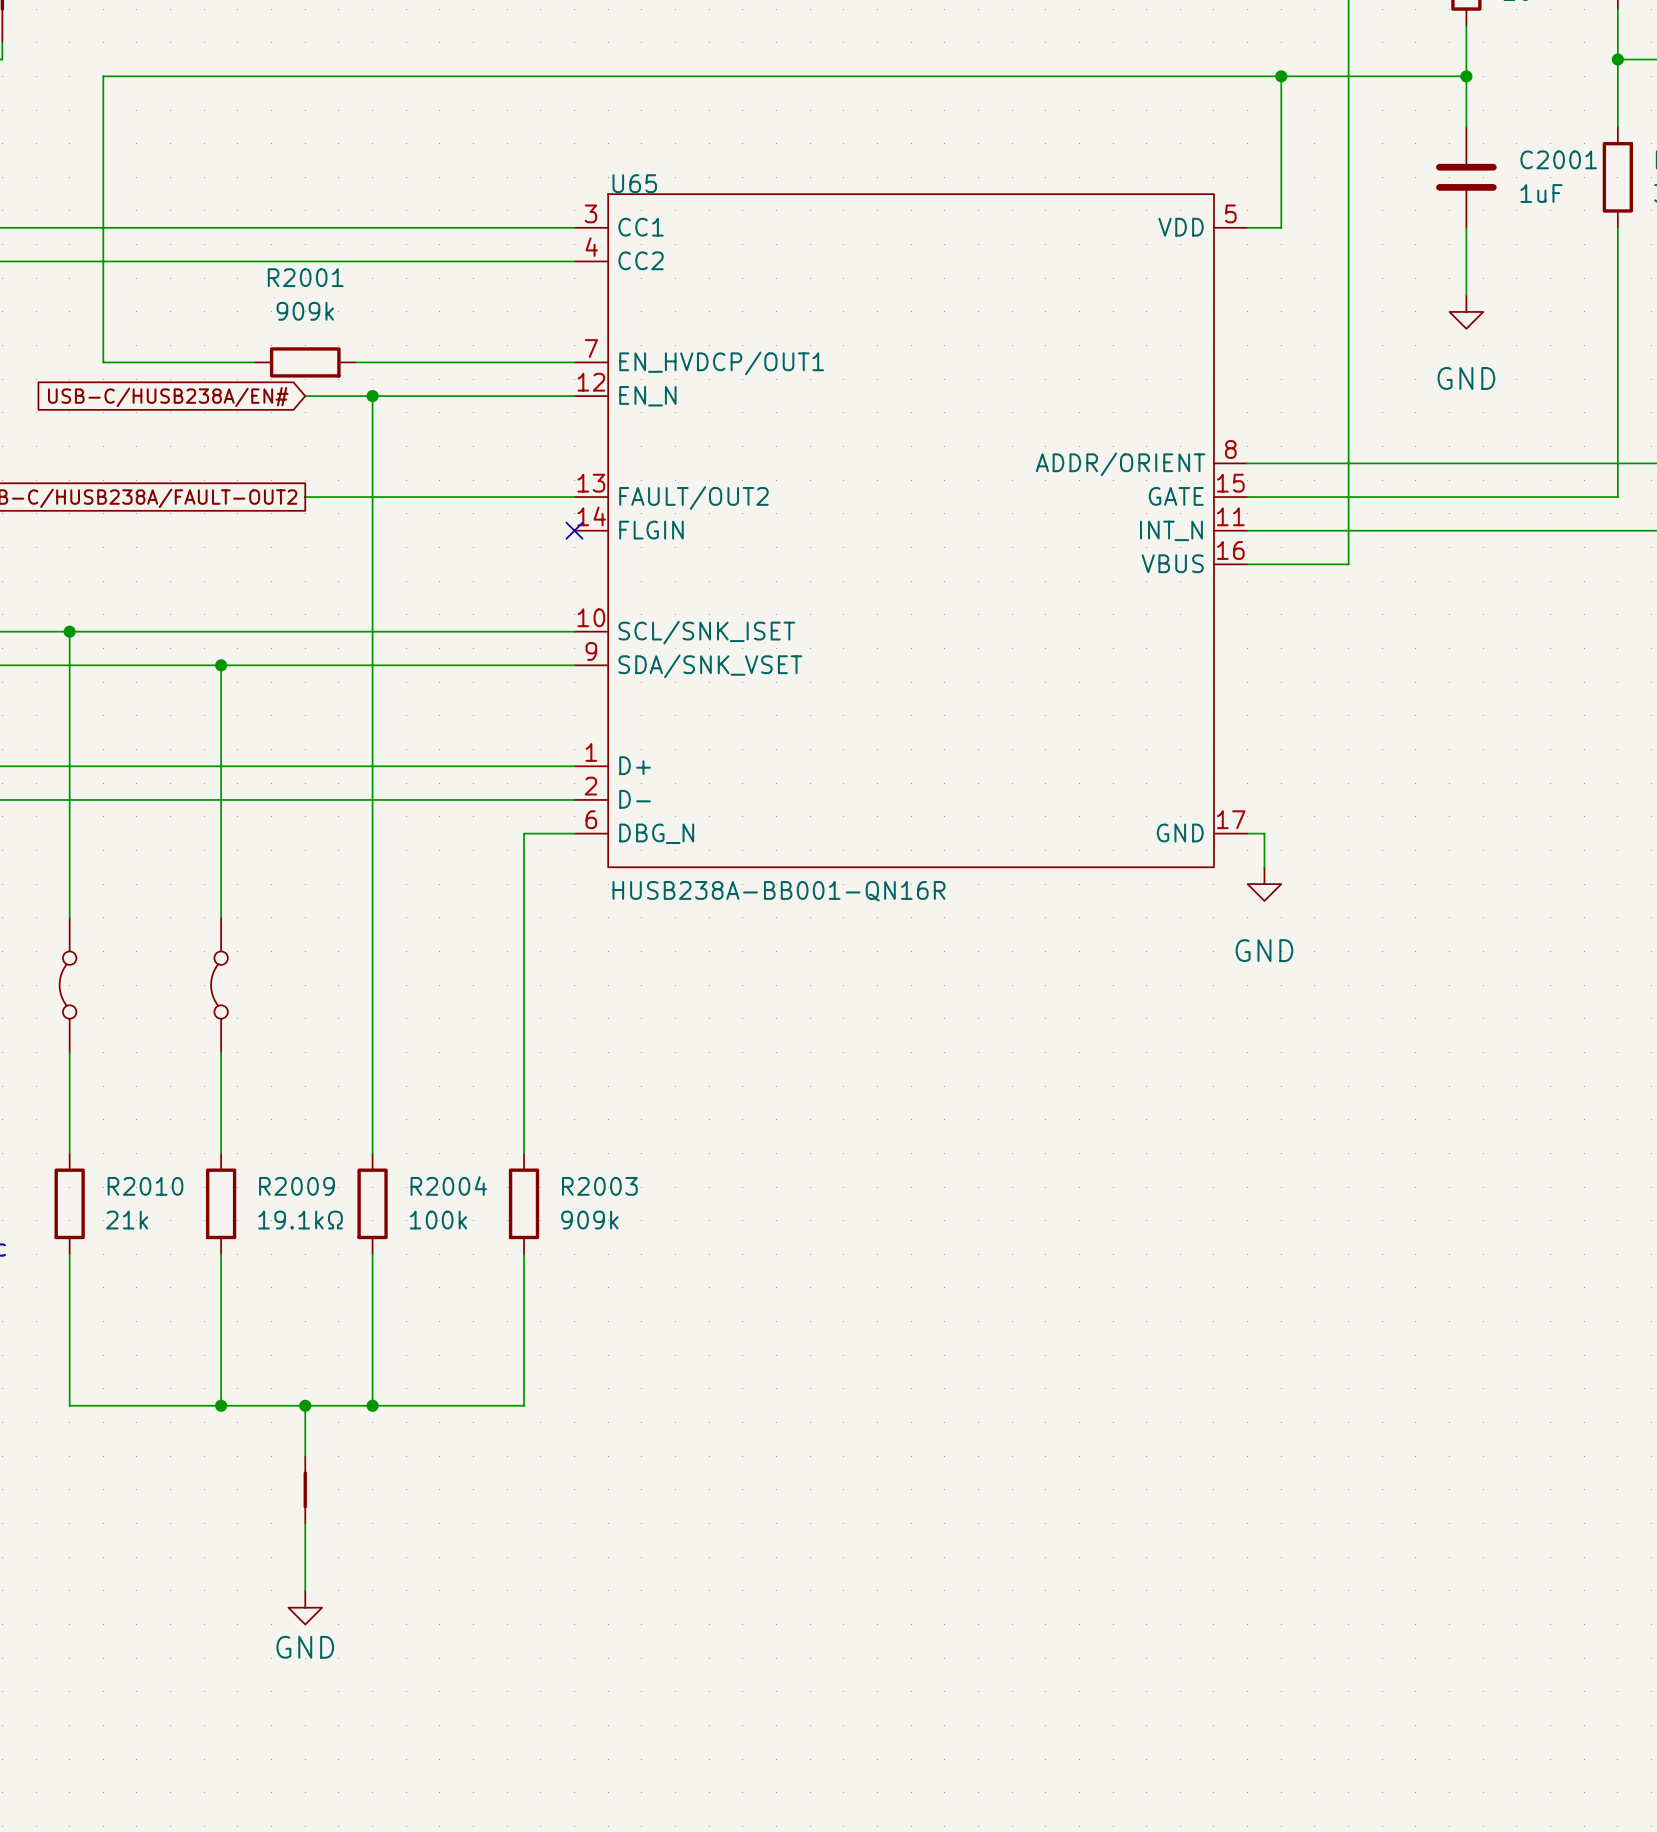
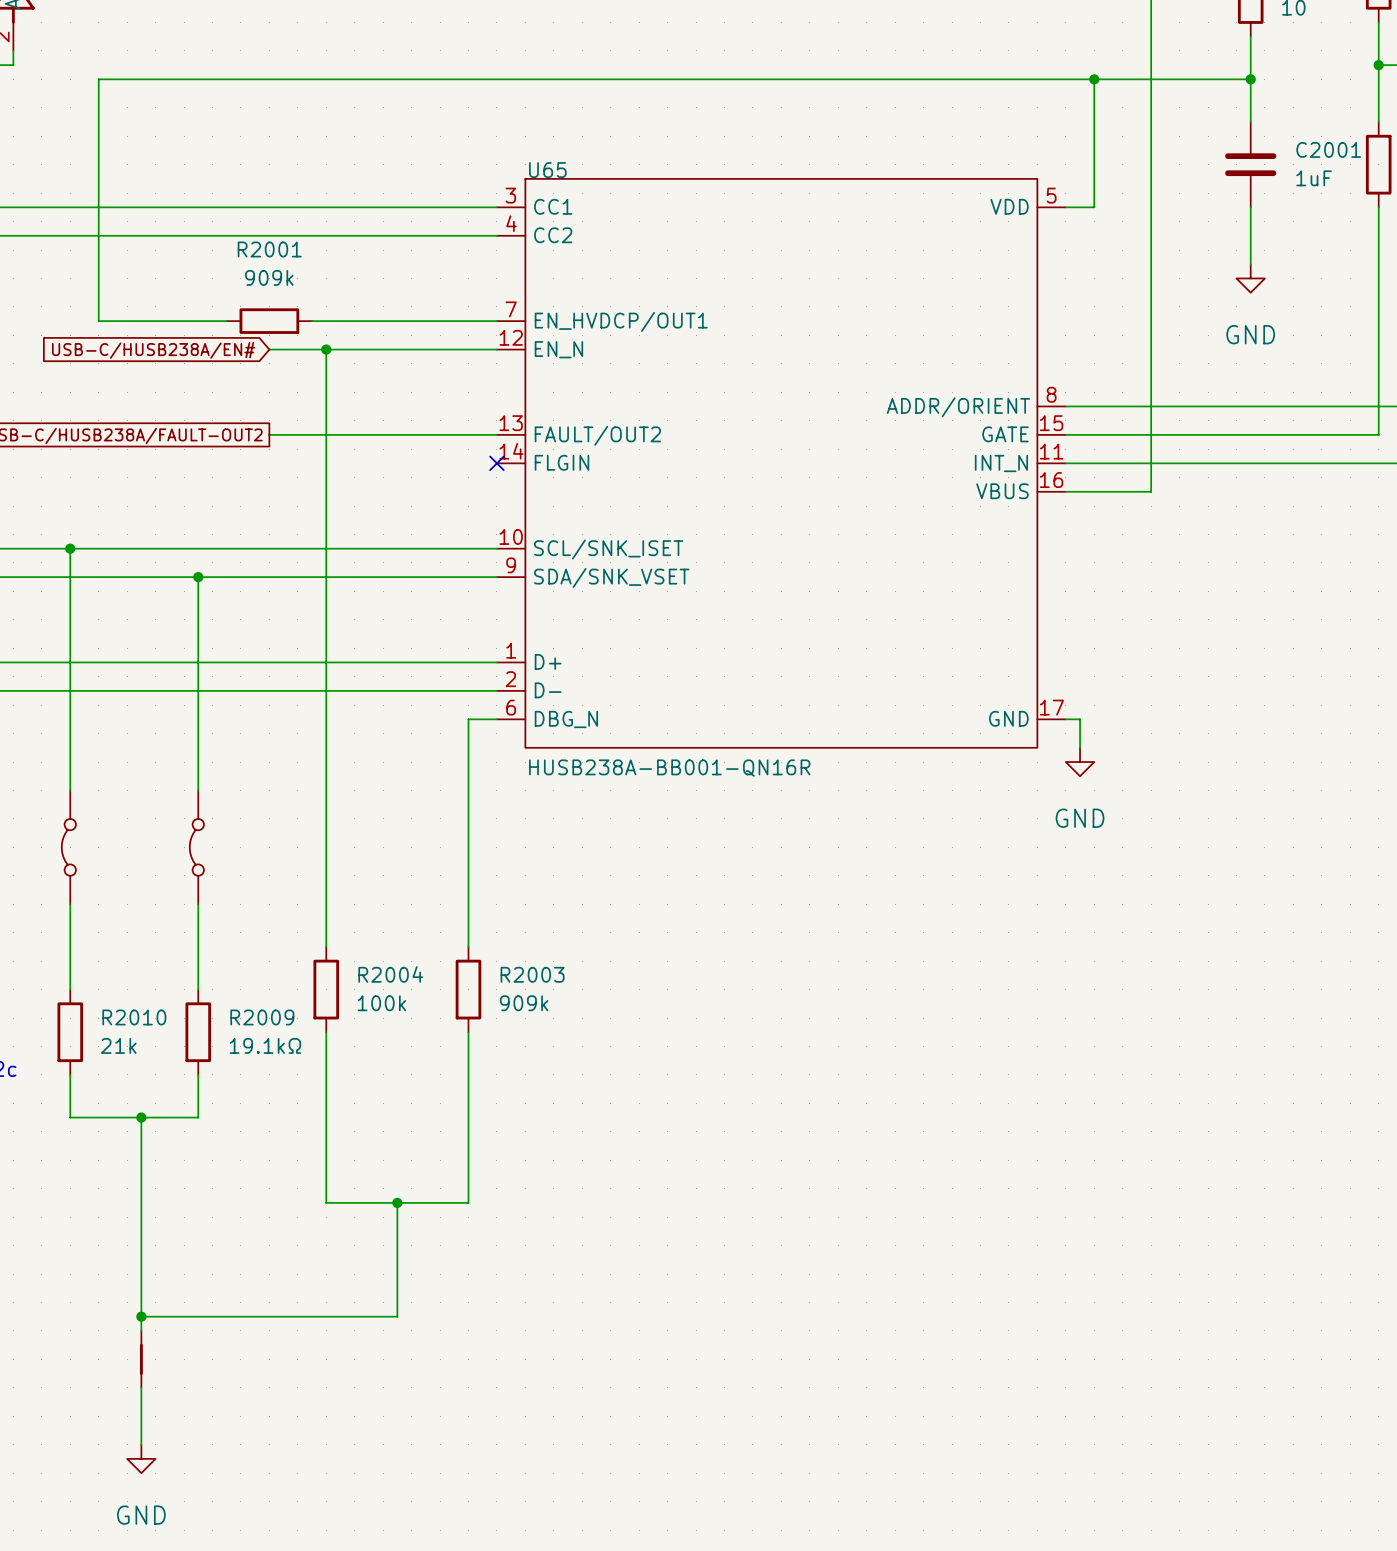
wire: (540, 833) (524, 833) (524, 1153) -> (468, 719) (468, 946)
wire: (372, 1102) (372, 1153) -> (326, 1032) (326, 1074)
R2004 position: (372, 1203) -> (326, 989)
R2003 position: (524, 1203) -> (468, 989)
wire: (524, 1254) (524, 1405) -> (468, 1032) (468, 1202) (454, 1202)
wire: (69, 1304) (69, 1405) (372, 1405) -> (70, 1117) (198, 1117)
wire: none -> (141, 1117) (141, 1330)
junction: none -> (141, 1117)
wire: (221, 1304) (221, 1405) -> none
junction: (221, 1405) -> none
wire: (305, 1405) (305, 1456) -> none
junction: (305, 1405) -> none
junction: (372, 1405) -> none
wire: none -> (397, 1202) (397, 1316) (141, 1316)
junction: none -> (397, 1202)
part position: (305, 1489) -> (141, 1359)
wire: (305, 1523) (305, 1590) -> (141, 1387) (141, 1444)
junction: none -> (141, 1316)
power symbol position: GND (305, 1607) -> GND (141, 1458)
power symbol text position: GND (305, 1647) -> GND (141, 1515)

